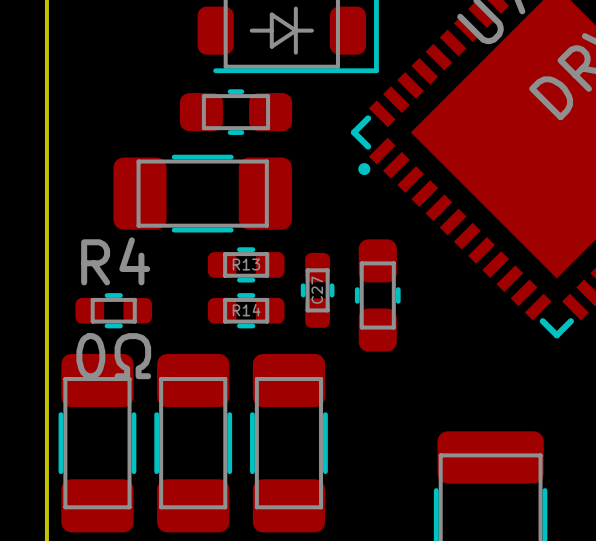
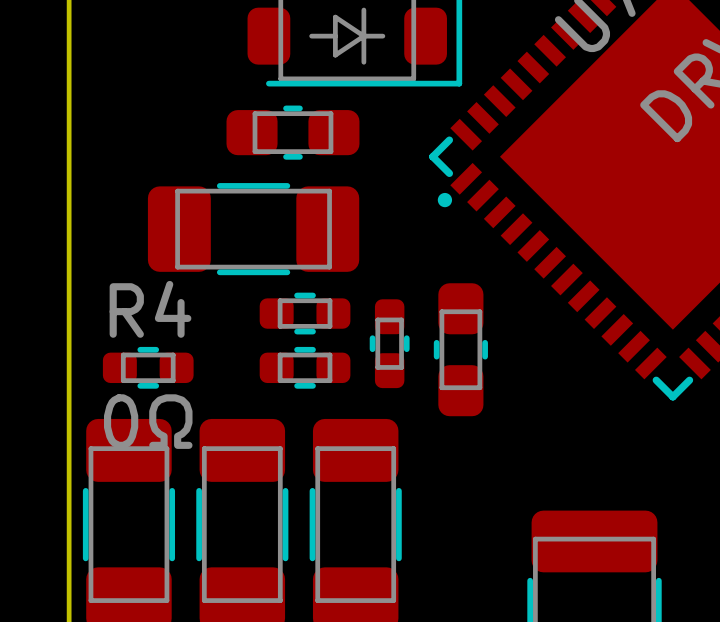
R13 name: R13 (246, 264) -> none
C27 name: C27 (317, 290) -> none
R14 name: R14 (246, 310) -> none

